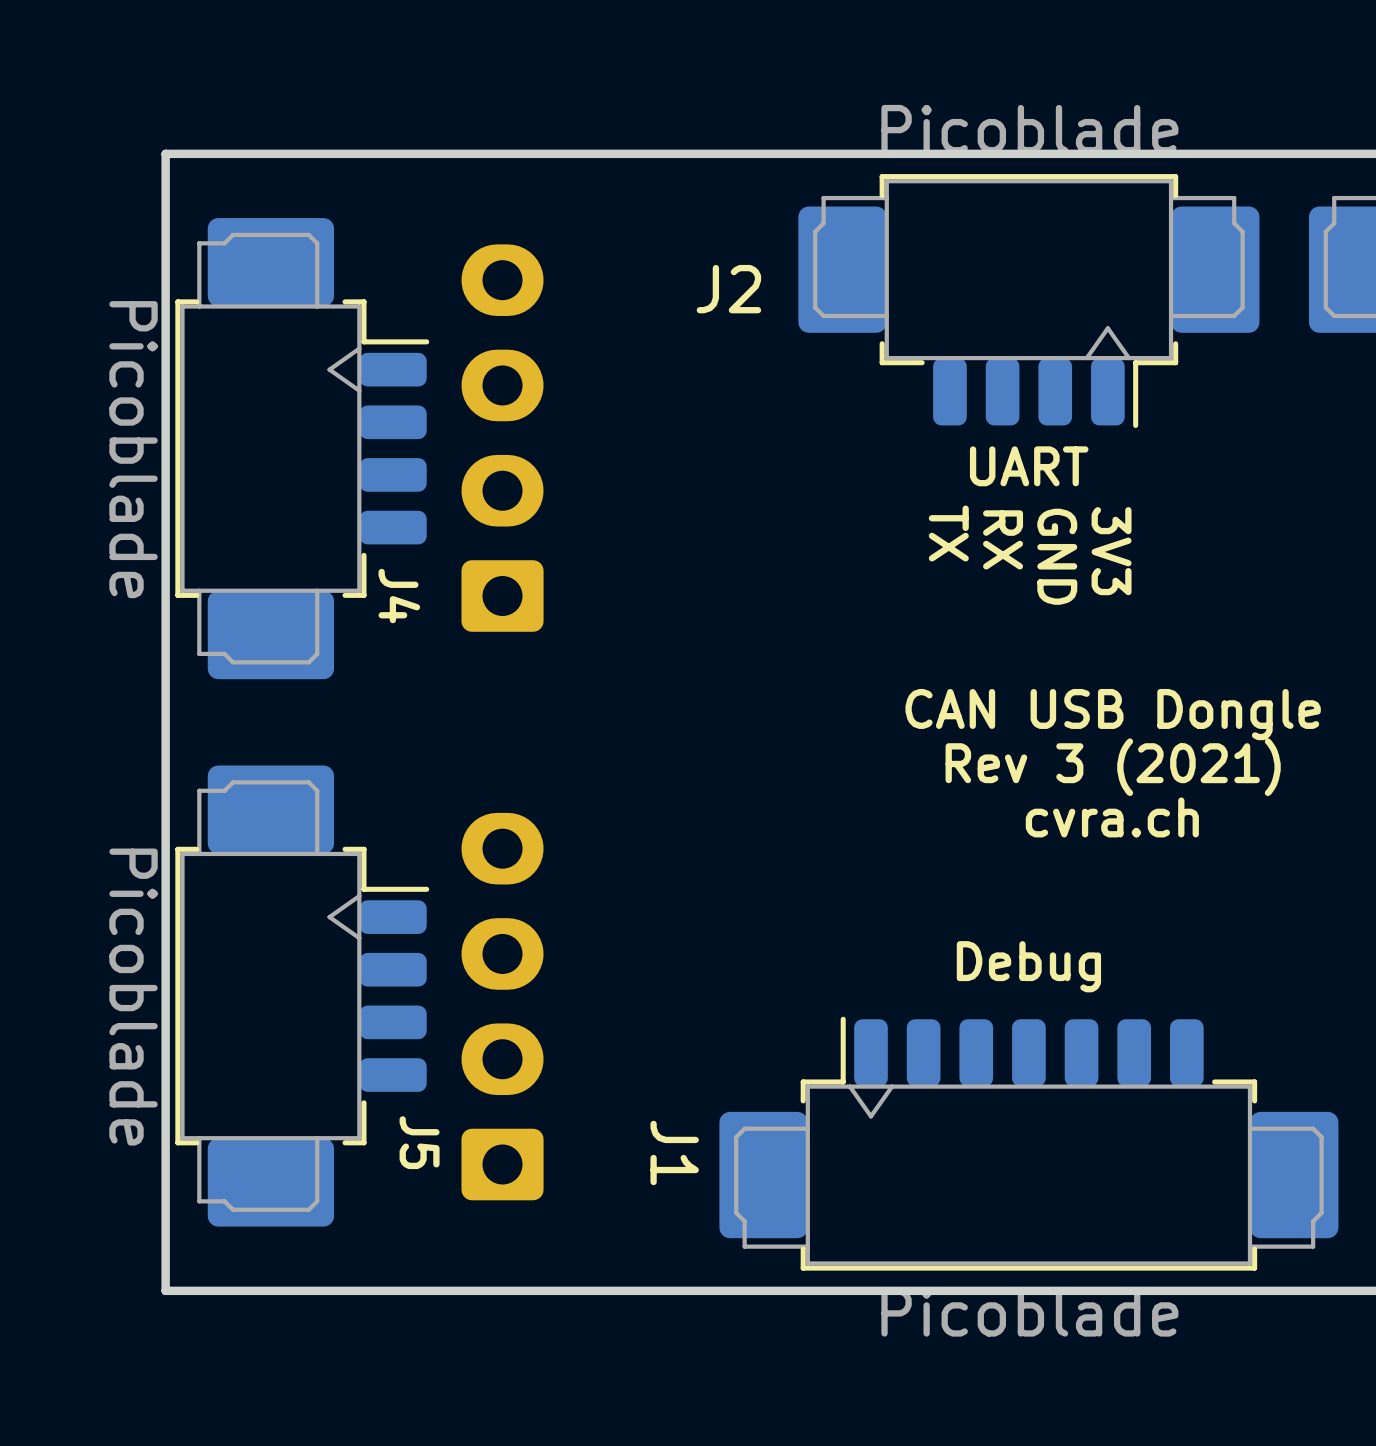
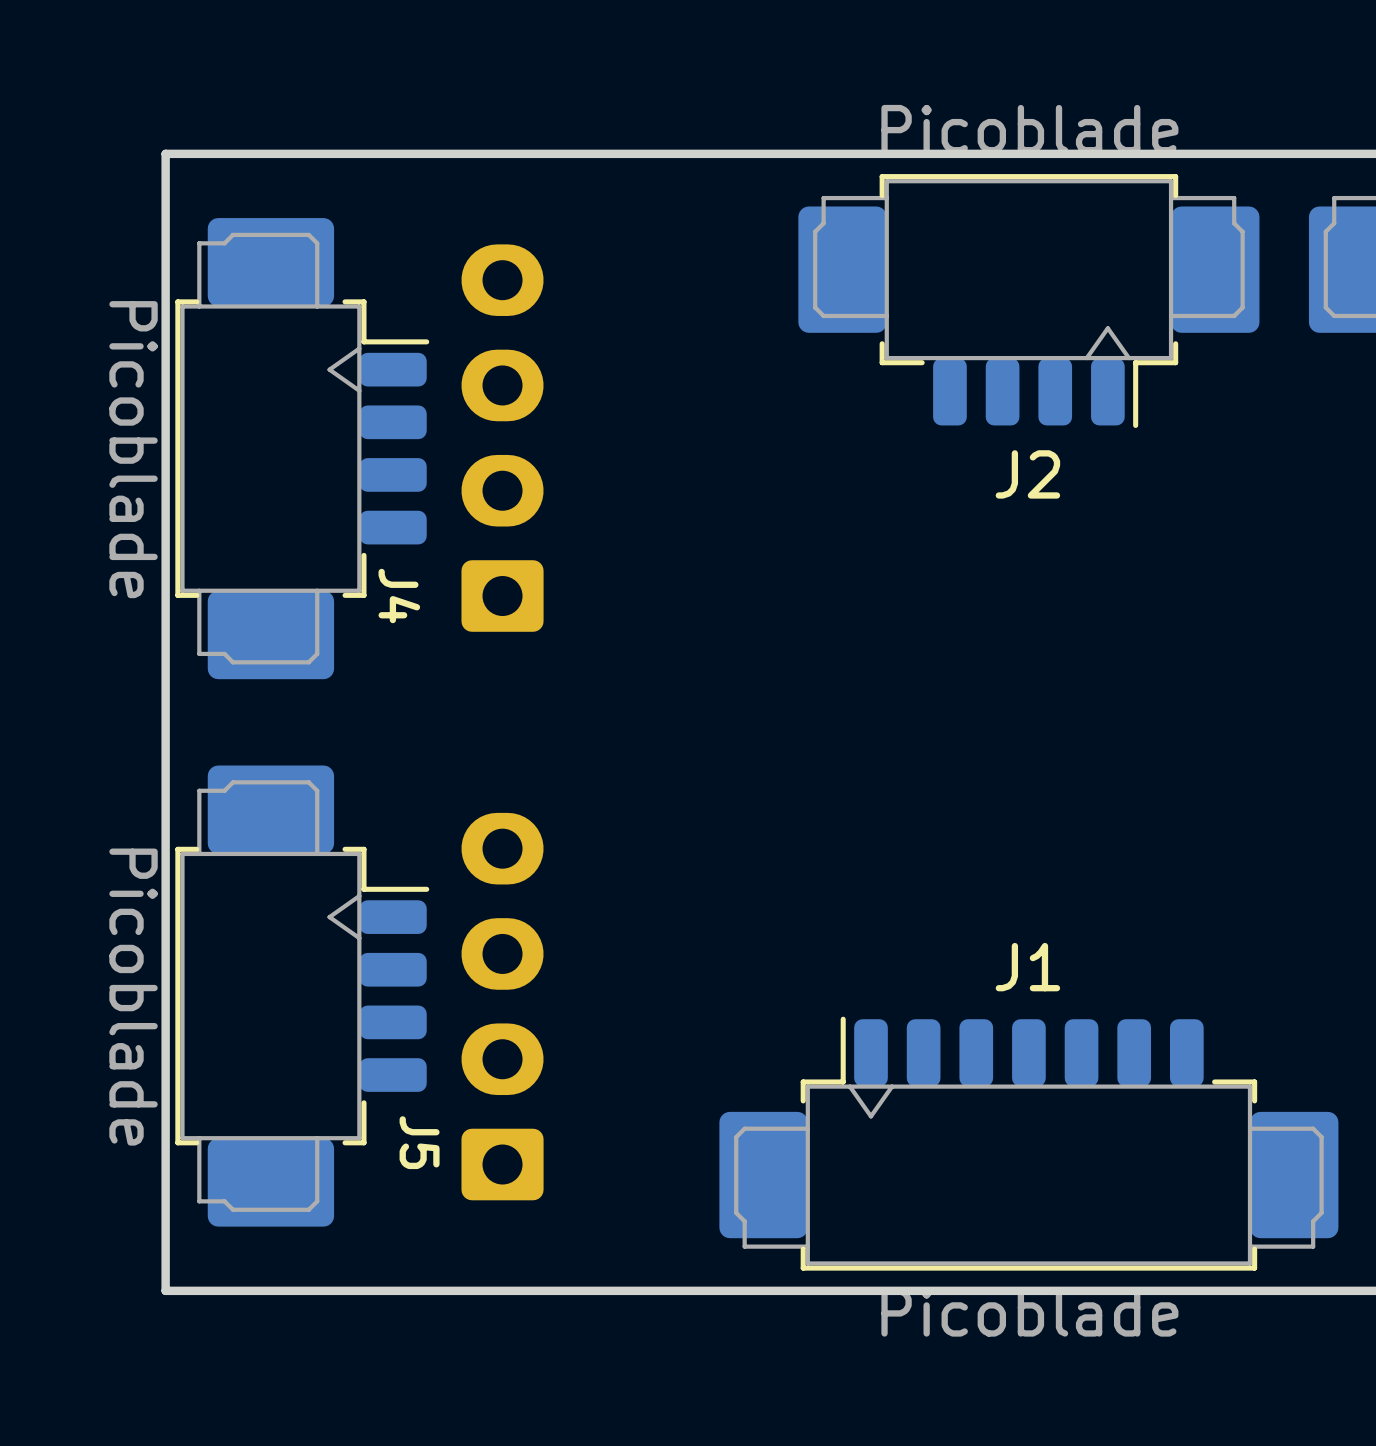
J2 name position: J2 (728, 289) -> J2 (1027, 474)
J2 text: UART (1029, 466) -> none
text: TX (948, 533) -> none
text: RX (1003, 539) -> none
text: 3V3 (1111, 551) -> none
text: GND (1057, 556) -> none
text: CAN USB Dongle (1113, 714) -> none
text: Rev 3 (2021) (1113, 767) -> none
text: cvra.ch (1112, 817) -> none
J1 text: Debug (1028, 966) -> none
J1 name rotation: 0° (674, 1152) -> 90° counterclockwise (1027, 967)
J1 name position: J1 (674, 1152) -> J1 (1027, 967)

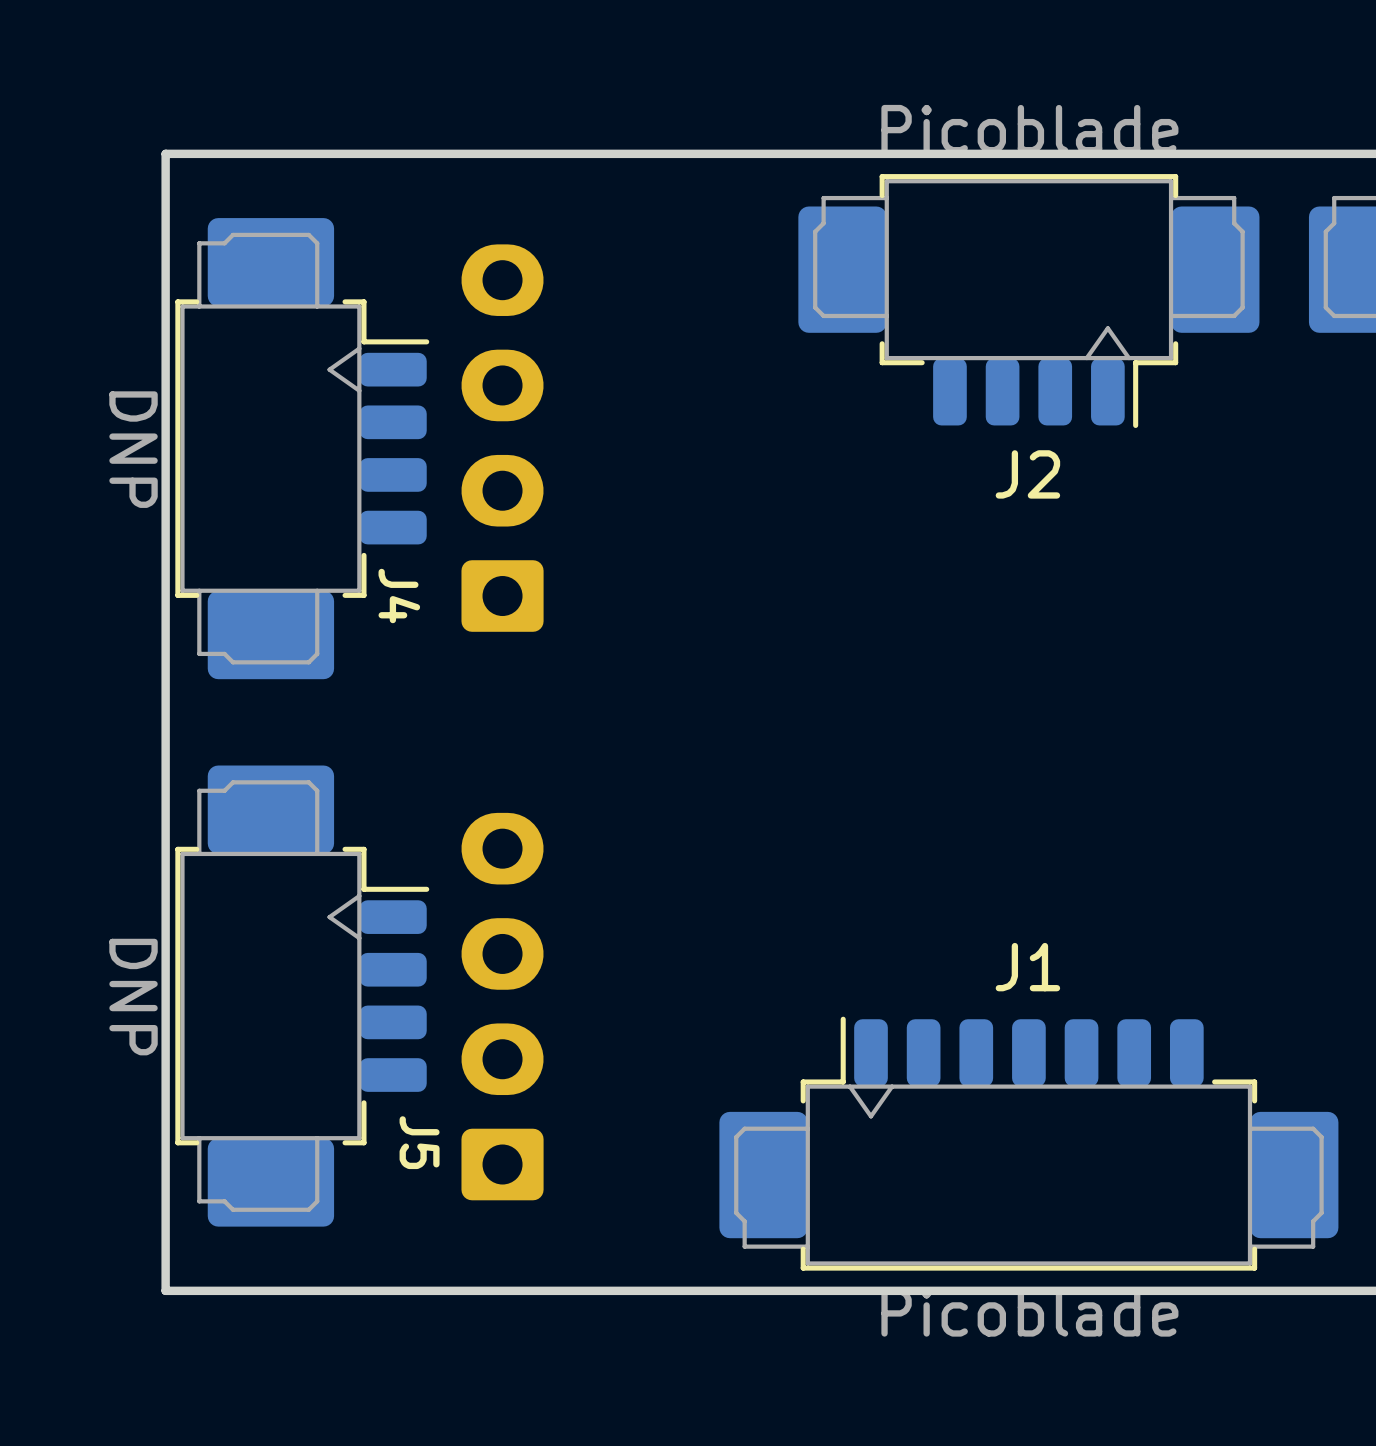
J4 value: Picoblade (133, 449) -> DNP (133, 449)
J5 value: Picoblade (133, 997) -> DNP (133, 997)

